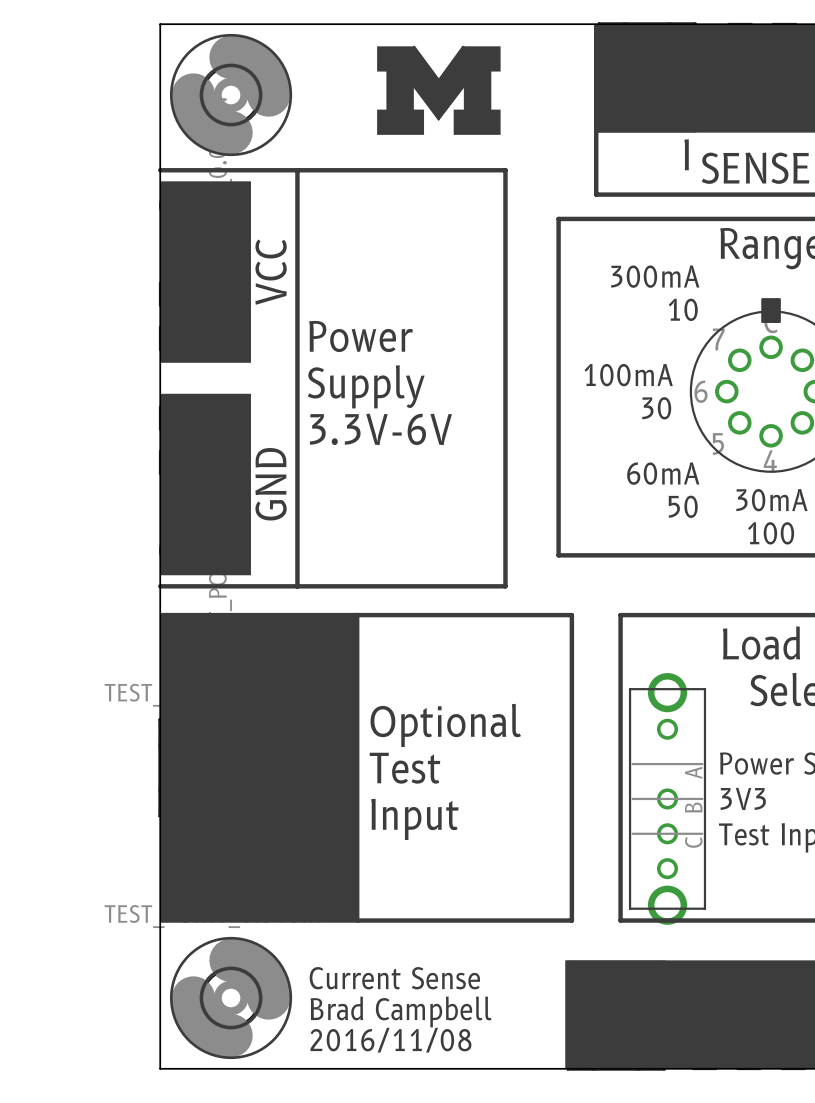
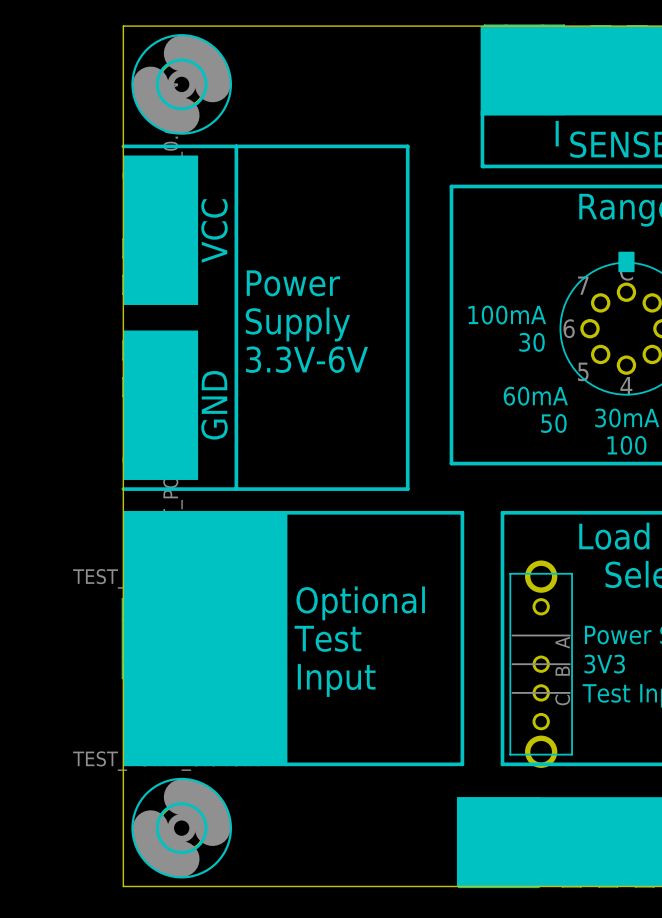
drawing: [377, 46, 501, 135] -> none
text: 300mA (655, 276) -> none
text: 10 (683, 309) -> none
text: Current Sense (394, 978) -> none
text: Brad Campbell (401, 1011) -> none
text: 2016/11/08 (390, 1040) -> none

